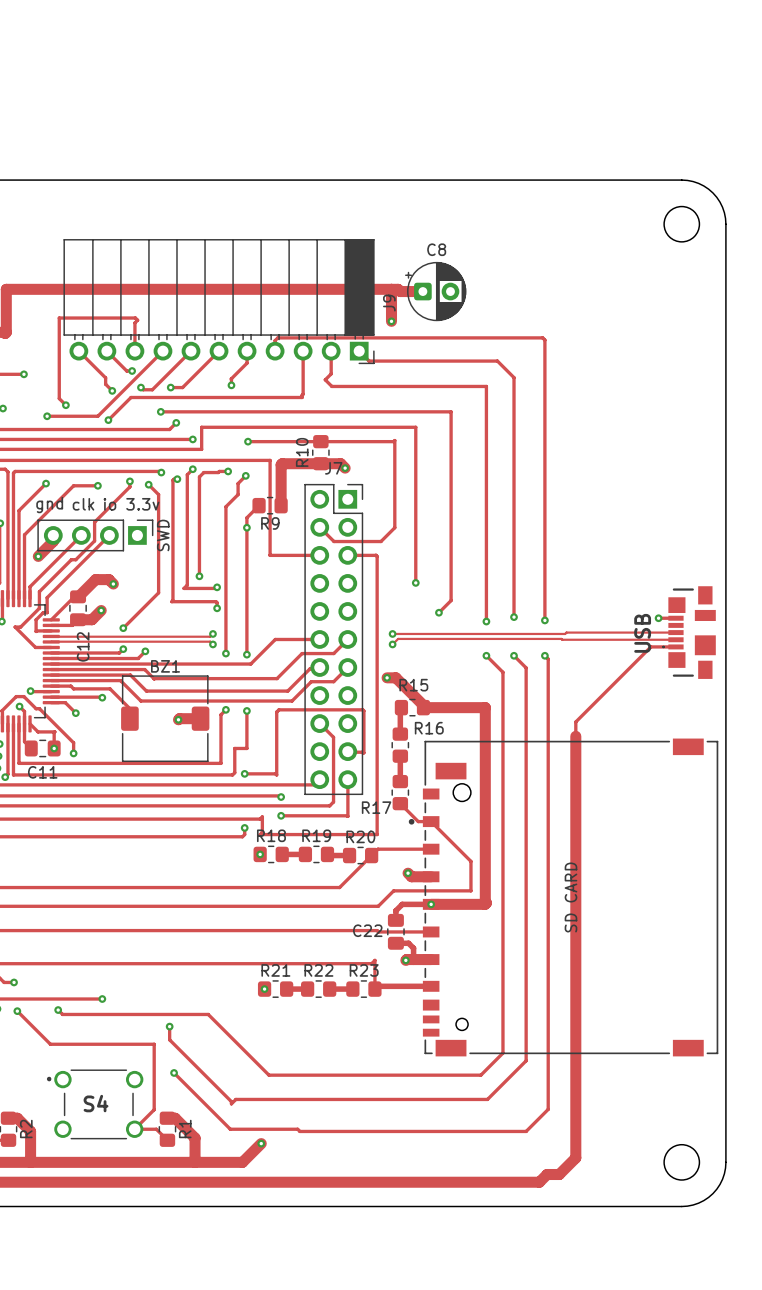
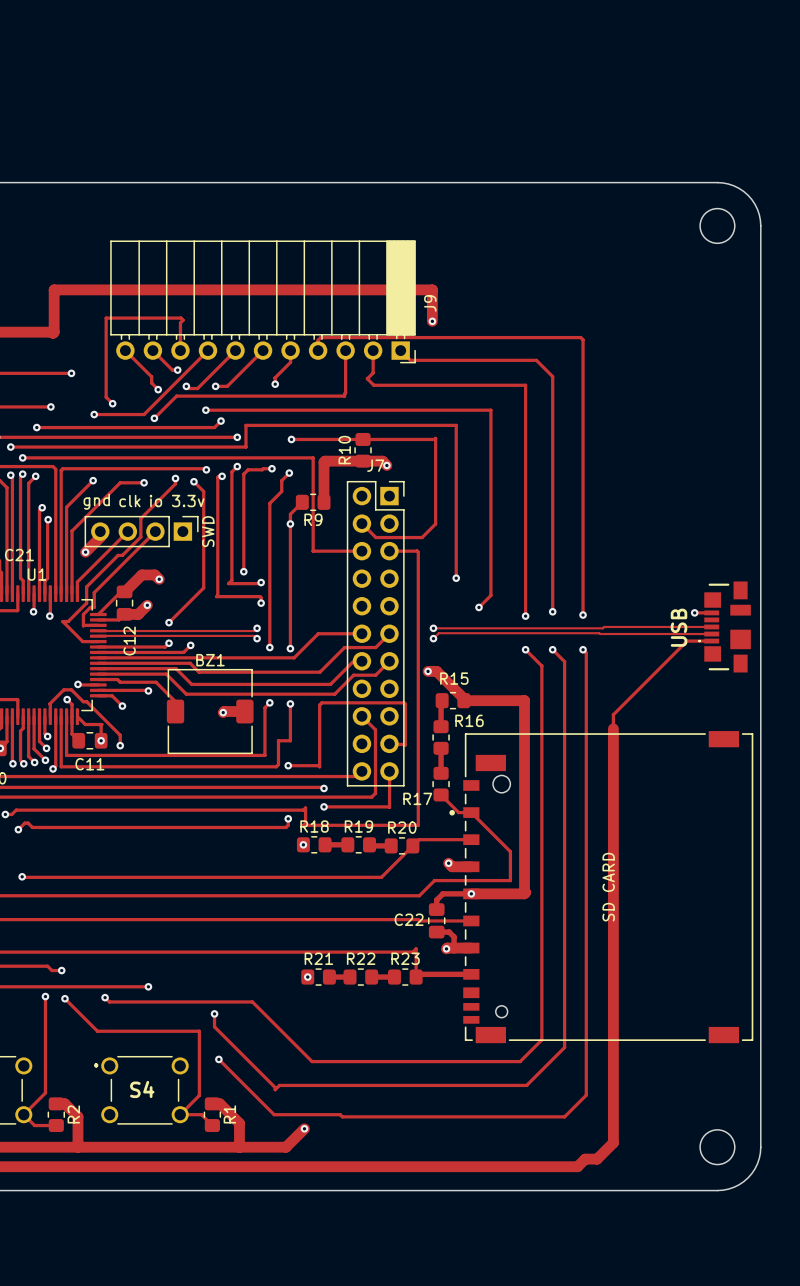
track: (391, 289) (398, 289) (400, 291) (422, 291) -> none
C8: (435, 291) -> none

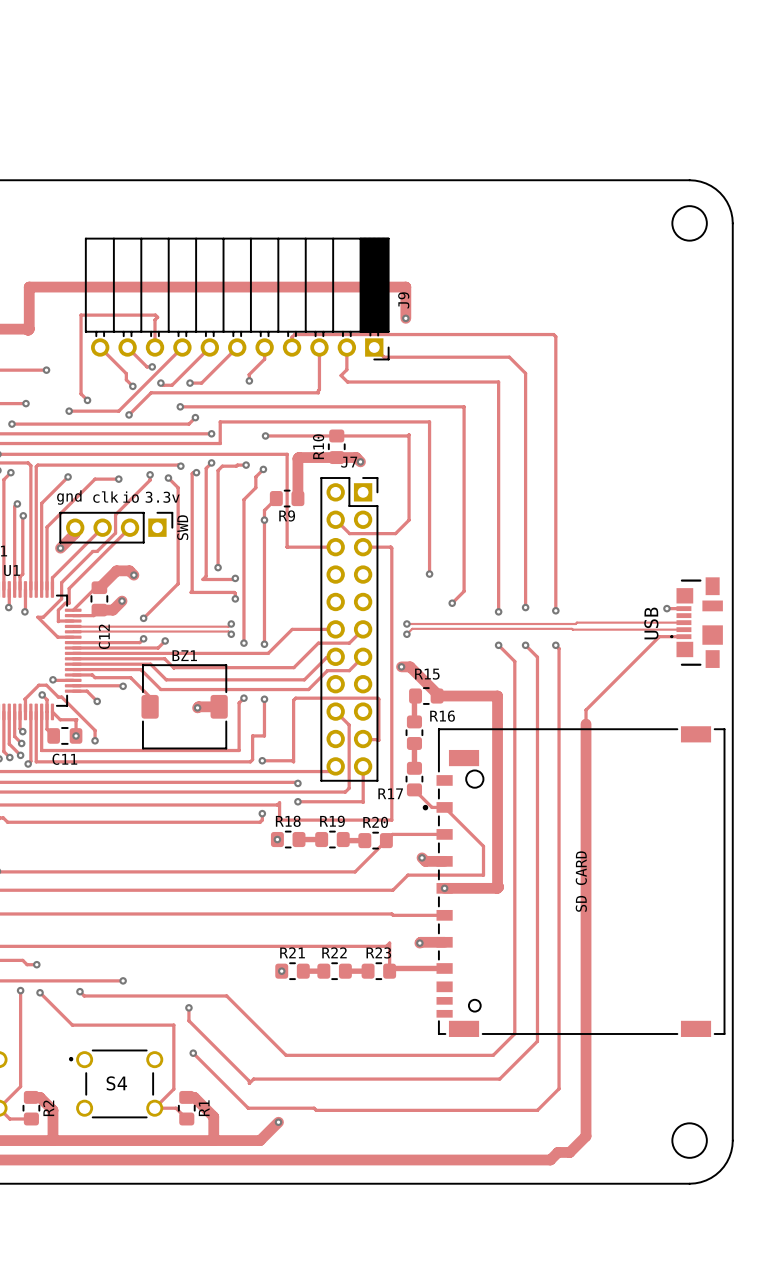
track: (471, 893) (442, 893) (436, 900) (436, 909) -> none
C22: (436, 920) -> none
track: (436, 932) (449, 932) (454, 936) (454, 948) -> none

